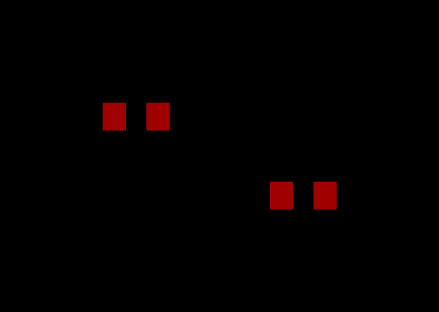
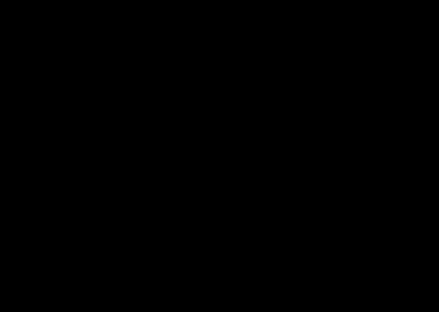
part: (136, 116) -> none
part: (303, 195) -> none

